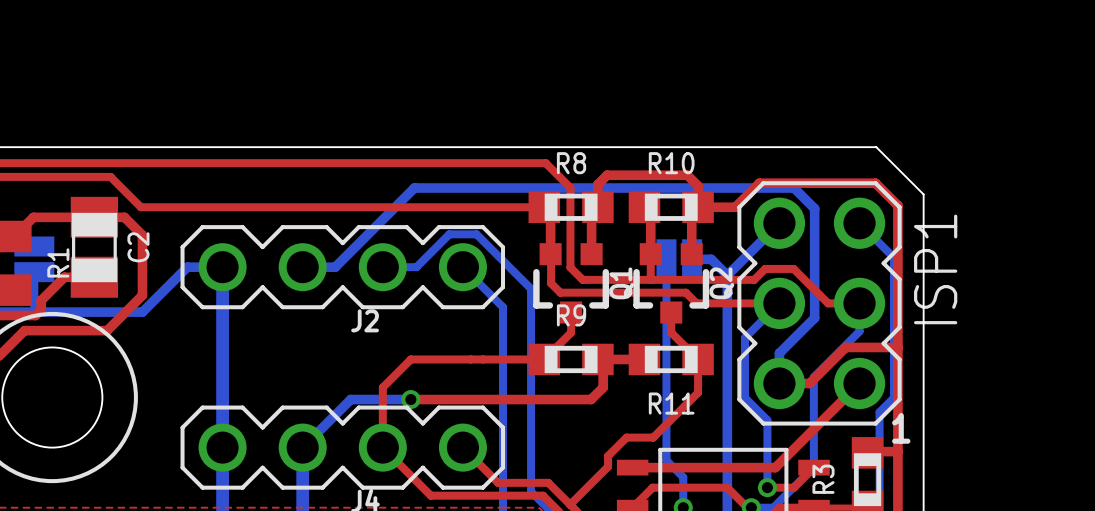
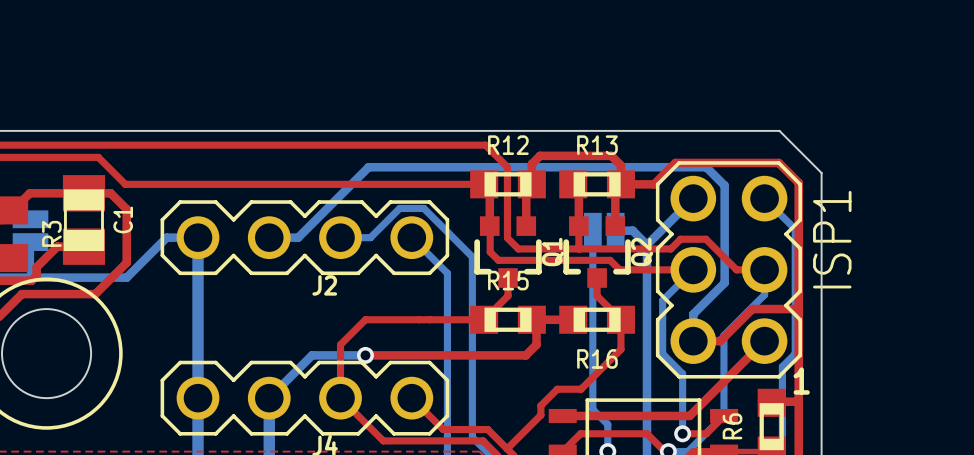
R8 name: R8 (571, 163) -> R12 (508, 145)
R10 name: R10 (671, 163) -> R13 (597, 145)
C2 name: C2 (138, 247) -> C1 (123, 219)
R1 name: R1 (58, 262) -> R3 (51, 233)
R9 name: R9 (571, 315) -> R15 (508, 280)
R11 name: R11 (671, 403) -> R16 (597, 358)
R3 name: R3 (823, 479) -> R6 (732, 426)

